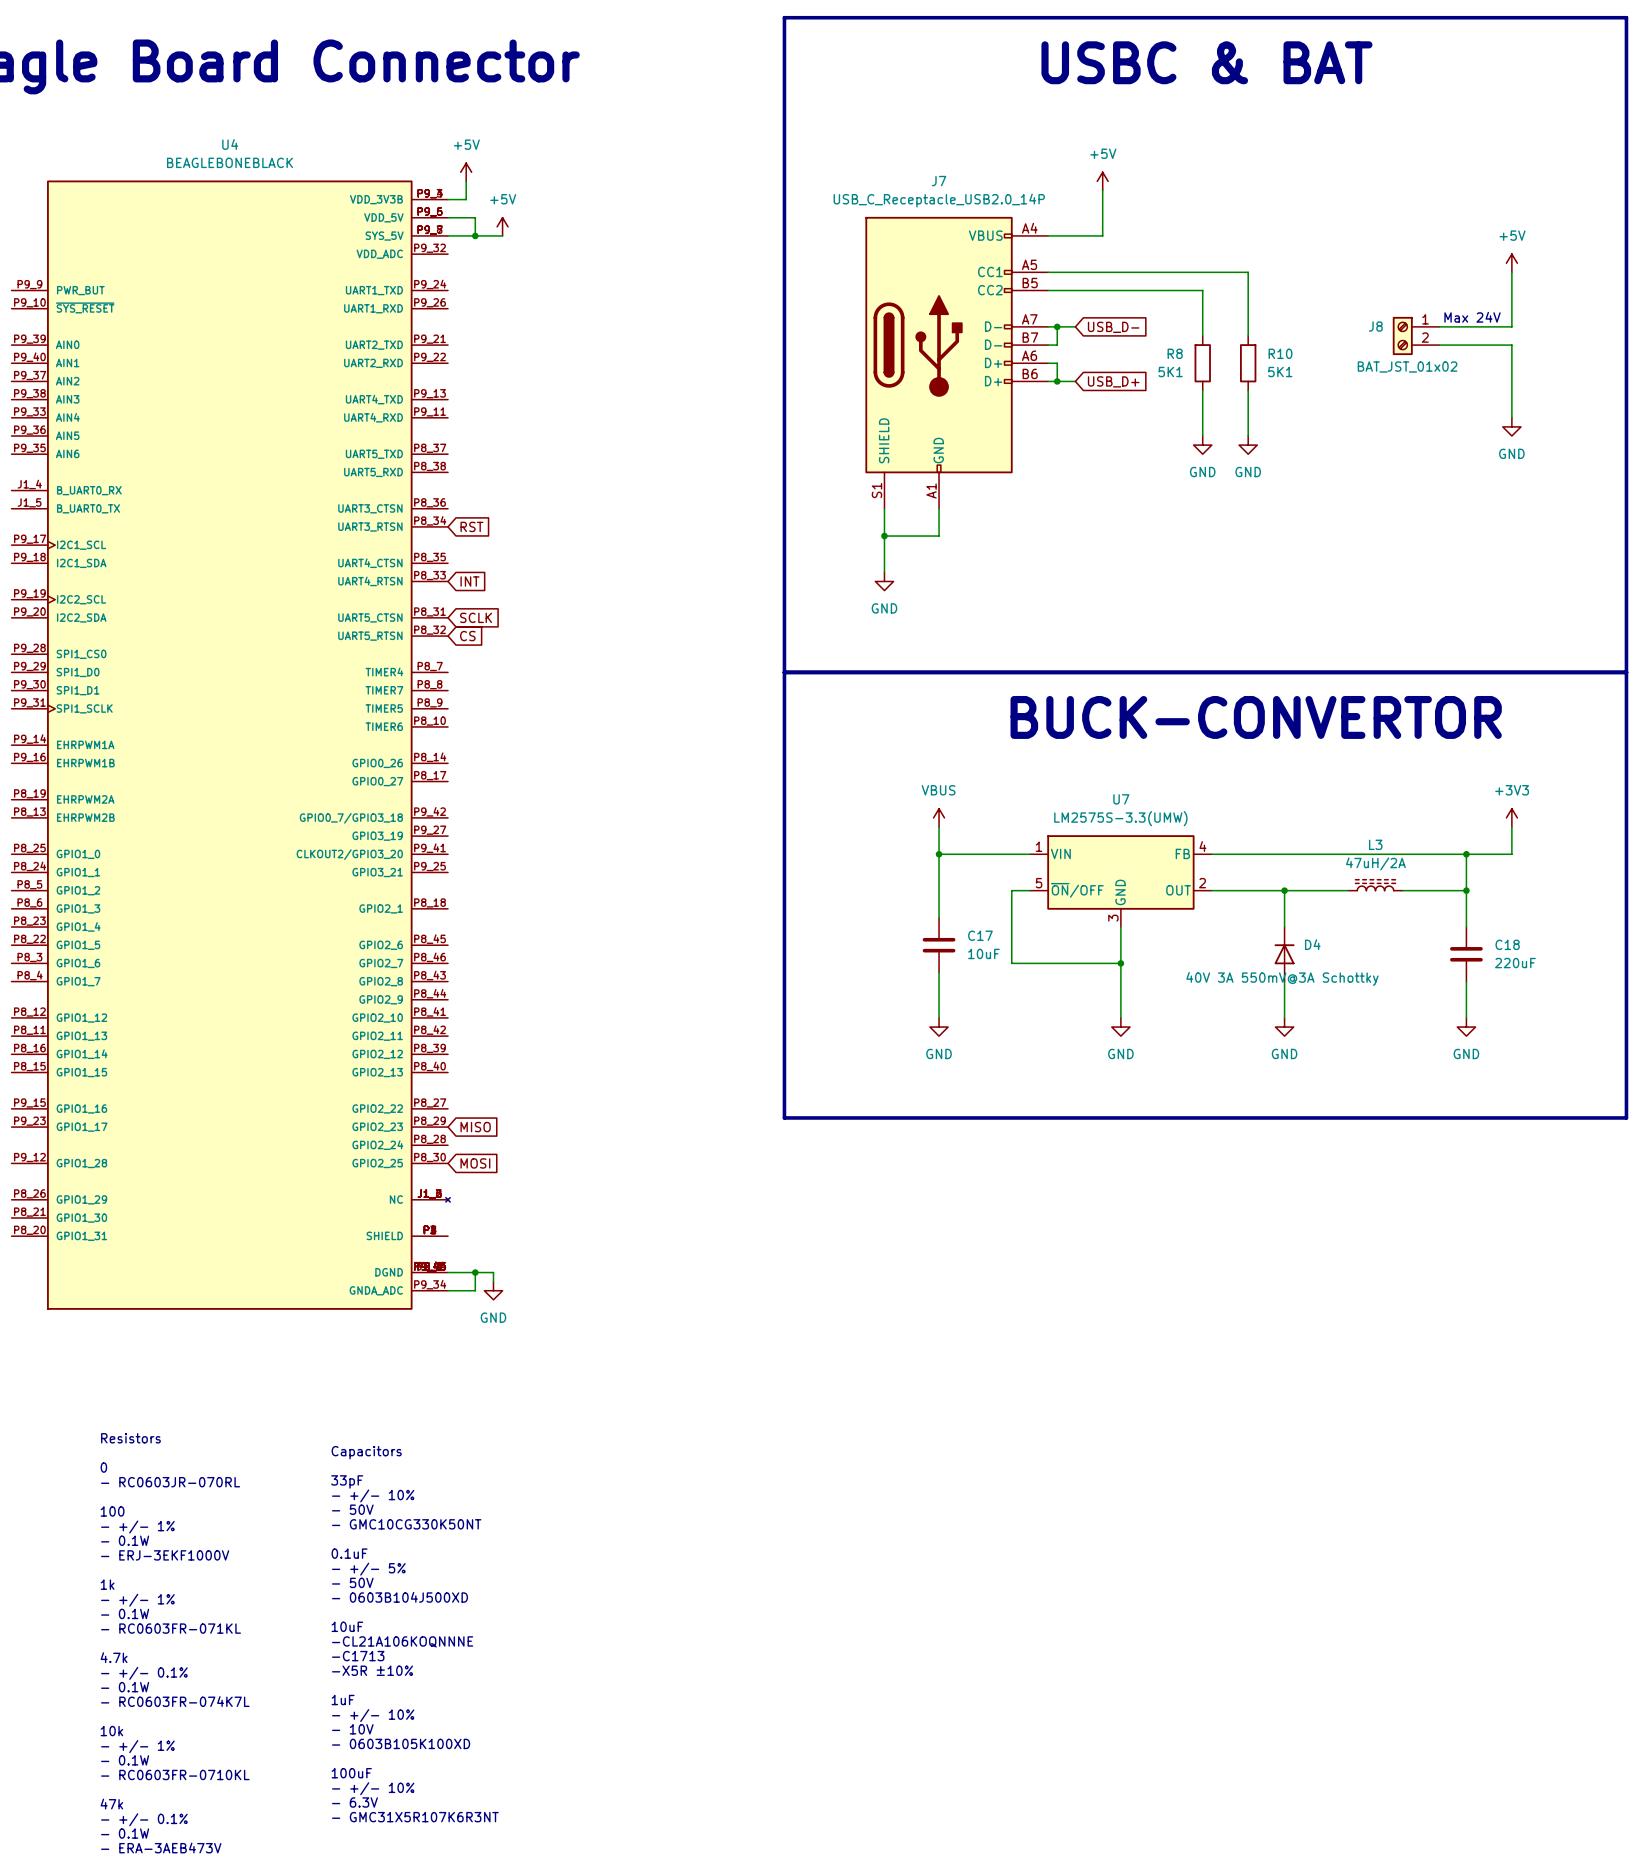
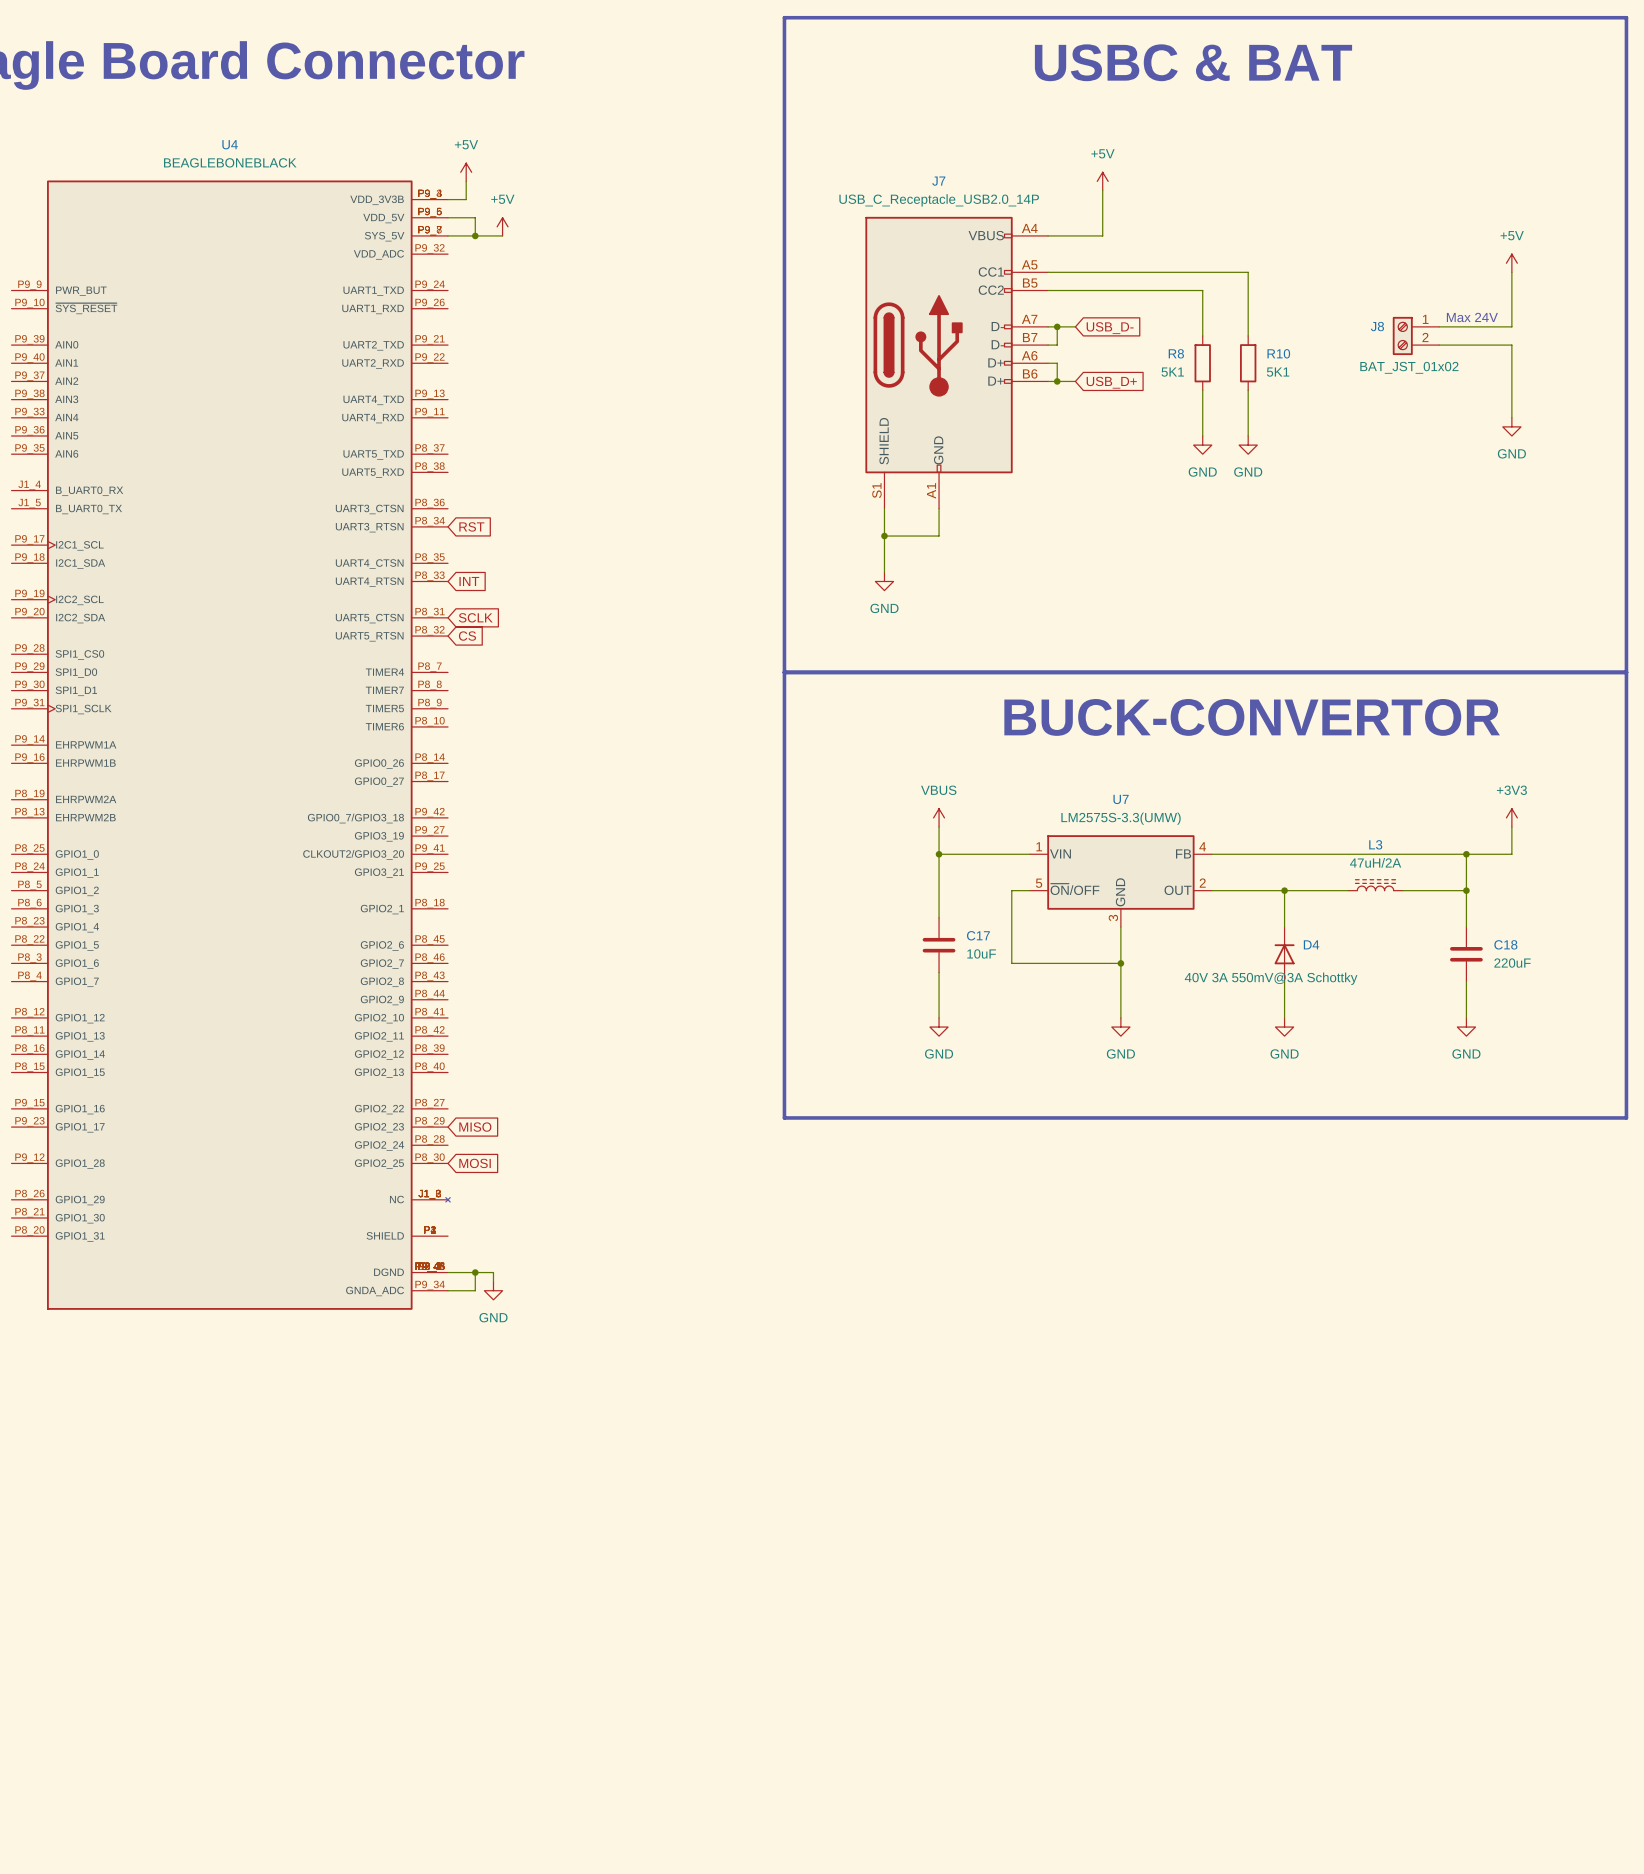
text: Resistors (130, 1438) -> none
text: Capacitors (366, 1452) -> none
text: 0 (103, 1467) -> none
text: 33pF (347, 1481) -> none
text: - RC0603JR-070RL (170, 1482) -> none
text: - +/- 10% (373, 1495) -> none
text: - 50V (352, 1509) -> none
text: 100 (112, 1511) -> none
text: - GMC10CG330K50NT (406, 1524) -> none
text: - +/- 1% (137, 1526) -> none
text: - 0.1W (125, 1540) -> none
text: 0.1uF (349, 1553) -> none
text: - ERJ-3EKF1000V (165, 1555) -> none
text: - +/- 5% (368, 1569) -> none
text: - 50V (352, 1582) -> none
text: 1k (107, 1584) -> none
text: - 0603B104J500XD (400, 1597) -> none
text: - +/- 1% (137, 1600) -> none
text: - 0.1W (125, 1613) -> none
text: 10uF (347, 1626) -> none
text: - RC0603FR-071KL (171, 1628) -> none
text: -CL21A106KOQNNNE (402, 1641) -> none
text: -C1713 (358, 1656) -> none
text: 4.7k (114, 1657) -> none
text: -X5R ±10% (372, 1670) -> none
text: - +/- 0.1% (144, 1673) -> none
text: - 0.1W (125, 1687) -> none
text: 1uF (343, 1700) -> none
text: - RC0603FR-074K7L (175, 1701) -> none
text: - +/- 10% (373, 1715) -> none
text: - 10V (352, 1729) -> none
text: 10k (111, 1731) -> none
text: - 0603B105K100XD (401, 1743) -> none
text: - +/- 1% (137, 1746) -> none
text: - 0.1W (125, 1760) -> none
text: 100uF (351, 1773) -> none
text: - RC0603FR-0710KL (175, 1774) -> none
text: - +/- 10% (373, 1788) -> none
text: - 6.3V (354, 1802) -> none
text: 47k (111, 1804) -> none
text: - GMC31X5R107K6R3NT (415, 1817) -> none
text: - +/- 0.1% (144, 1819) -> none
text: - 0.1W (125, 1833) -> none
text: - ERA-3AEB473V (161, 1847) -> none

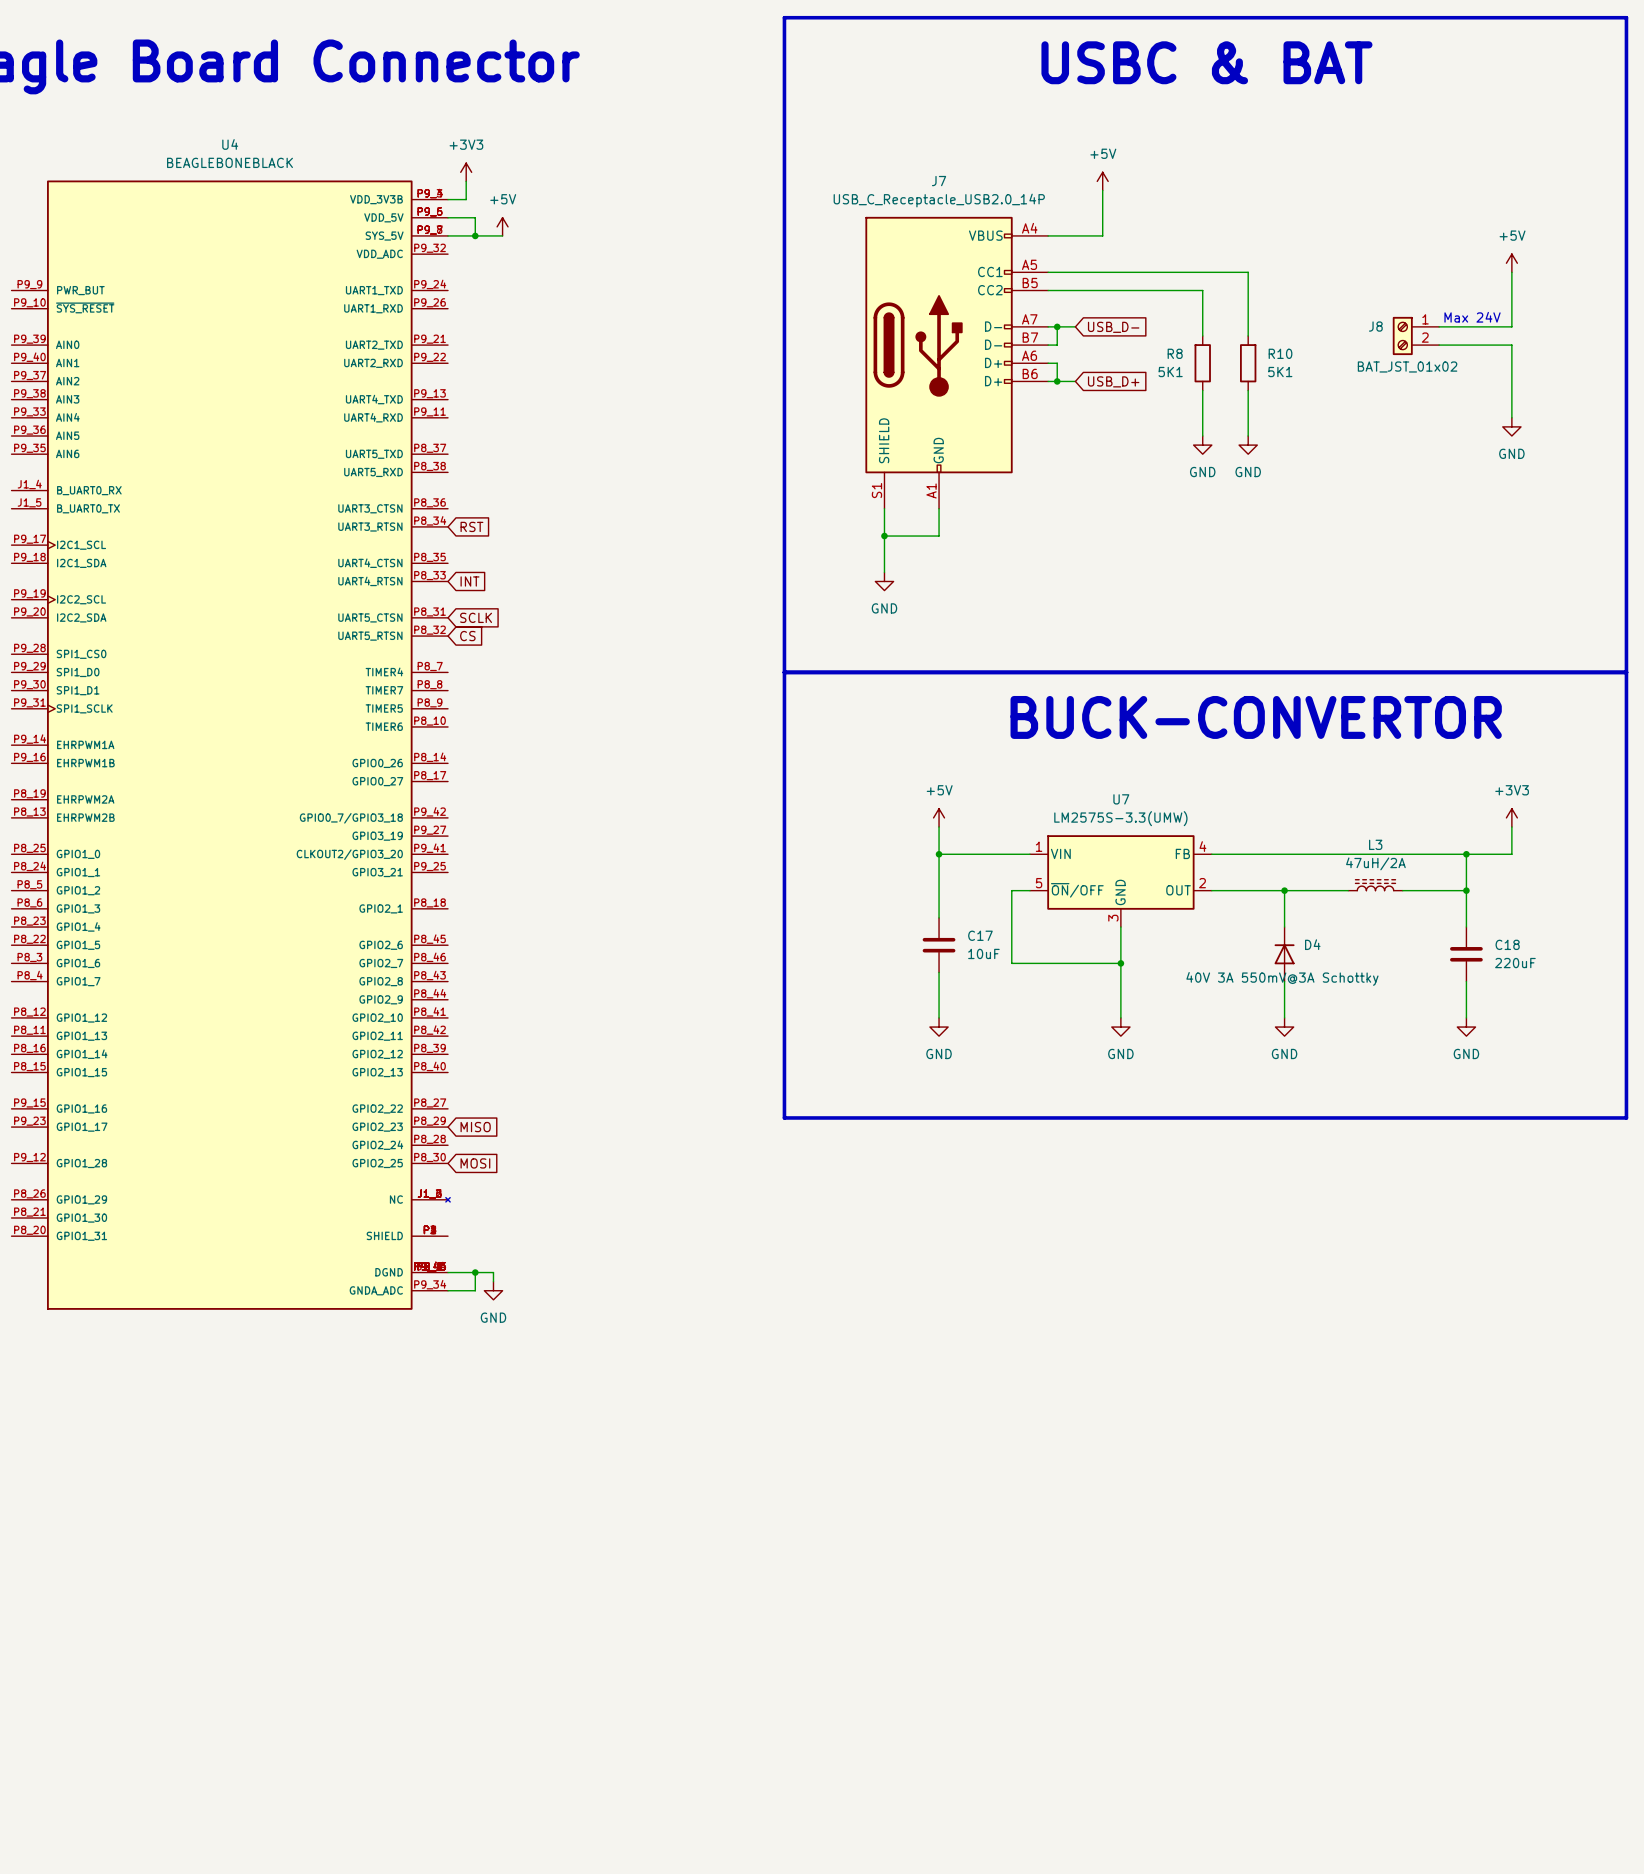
power symbol: +5V (466, 172) -> +3V3 (466, 172)
power symbol: VBUS (939, 817) -> +5V (939, 817)

